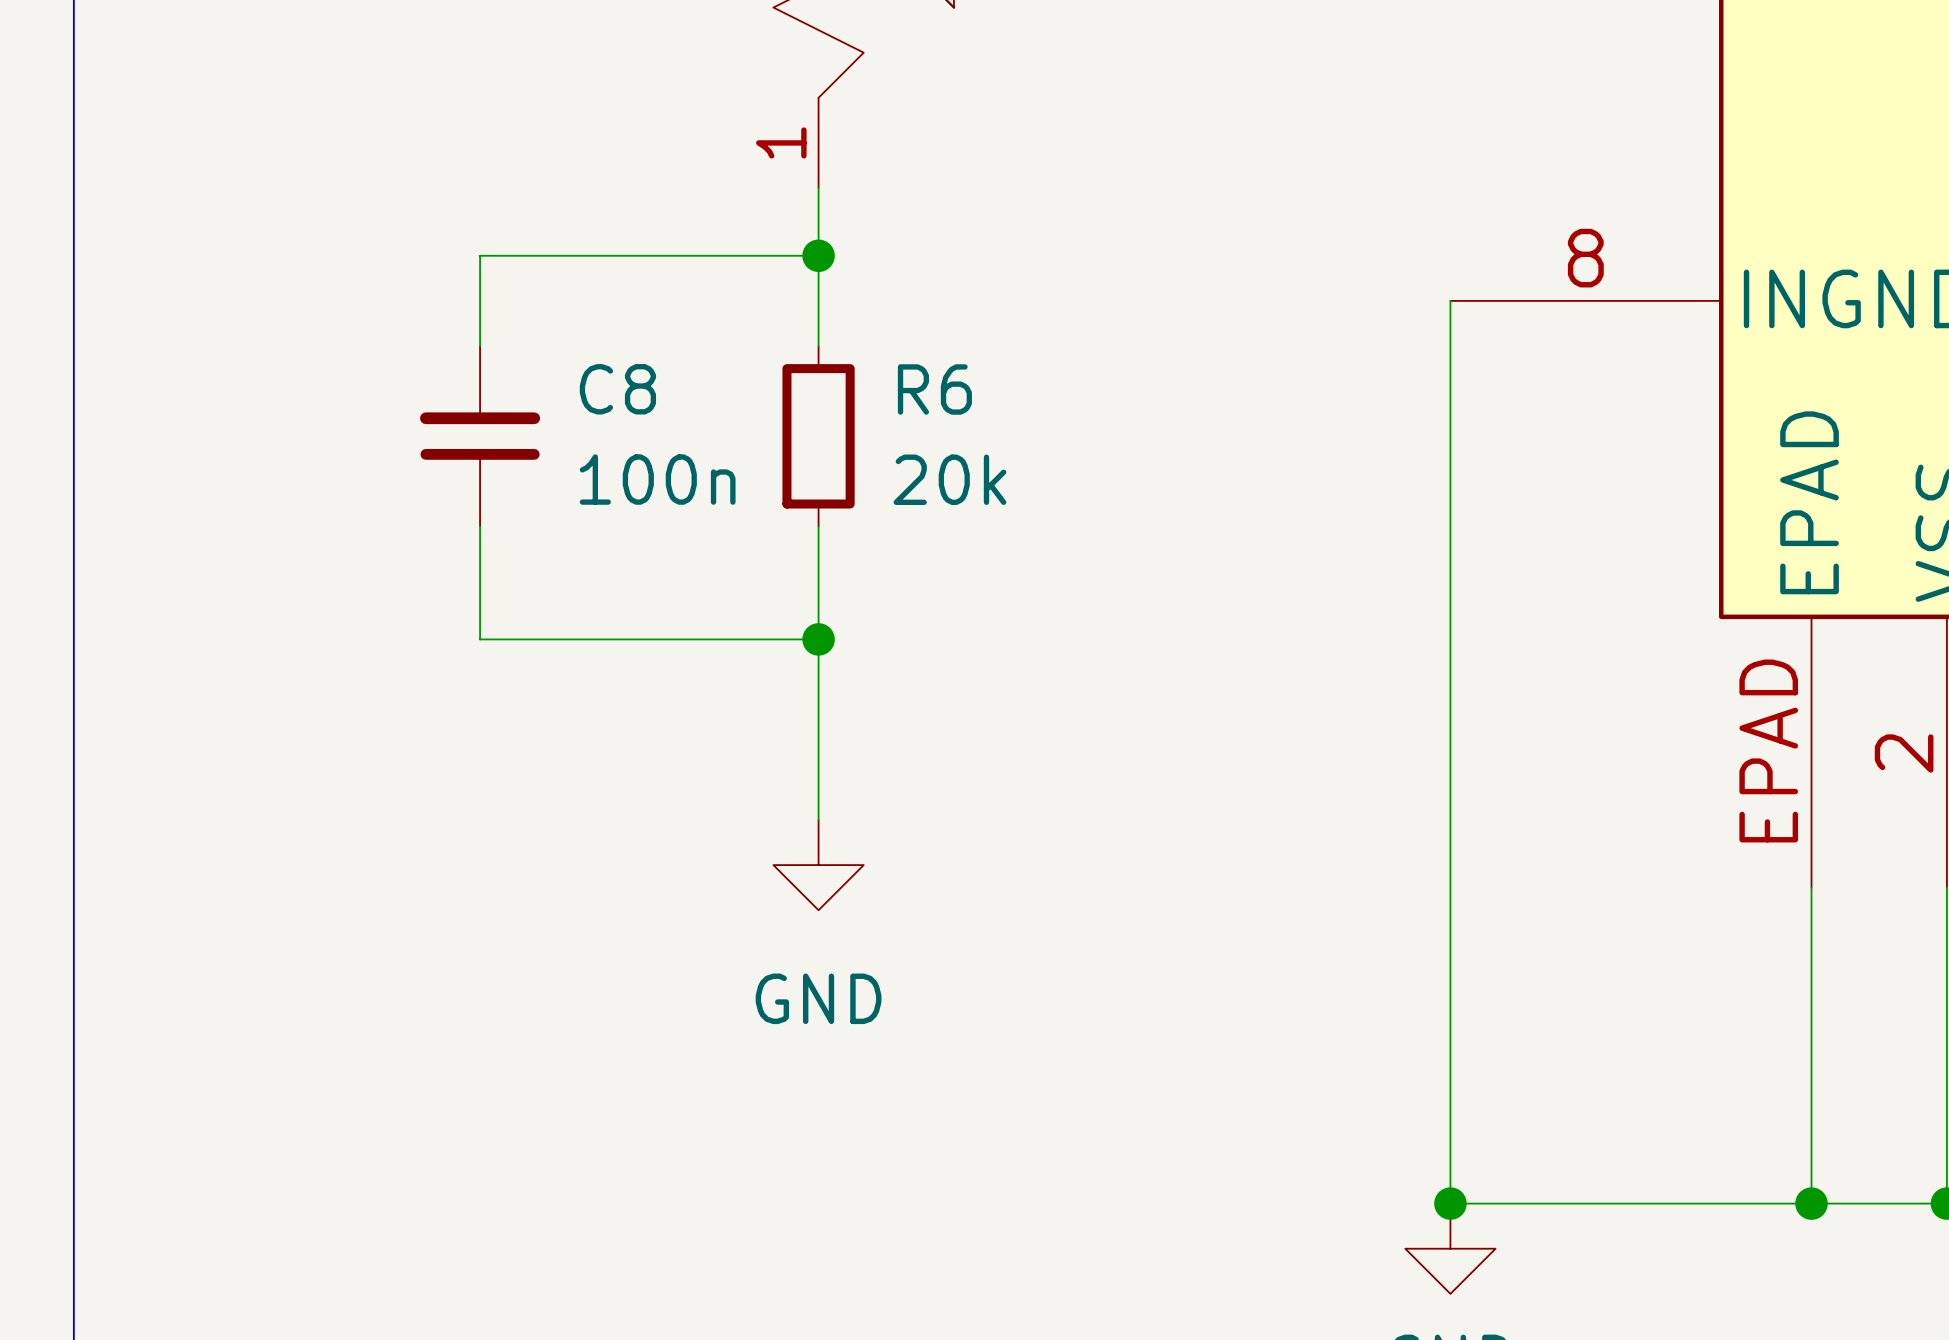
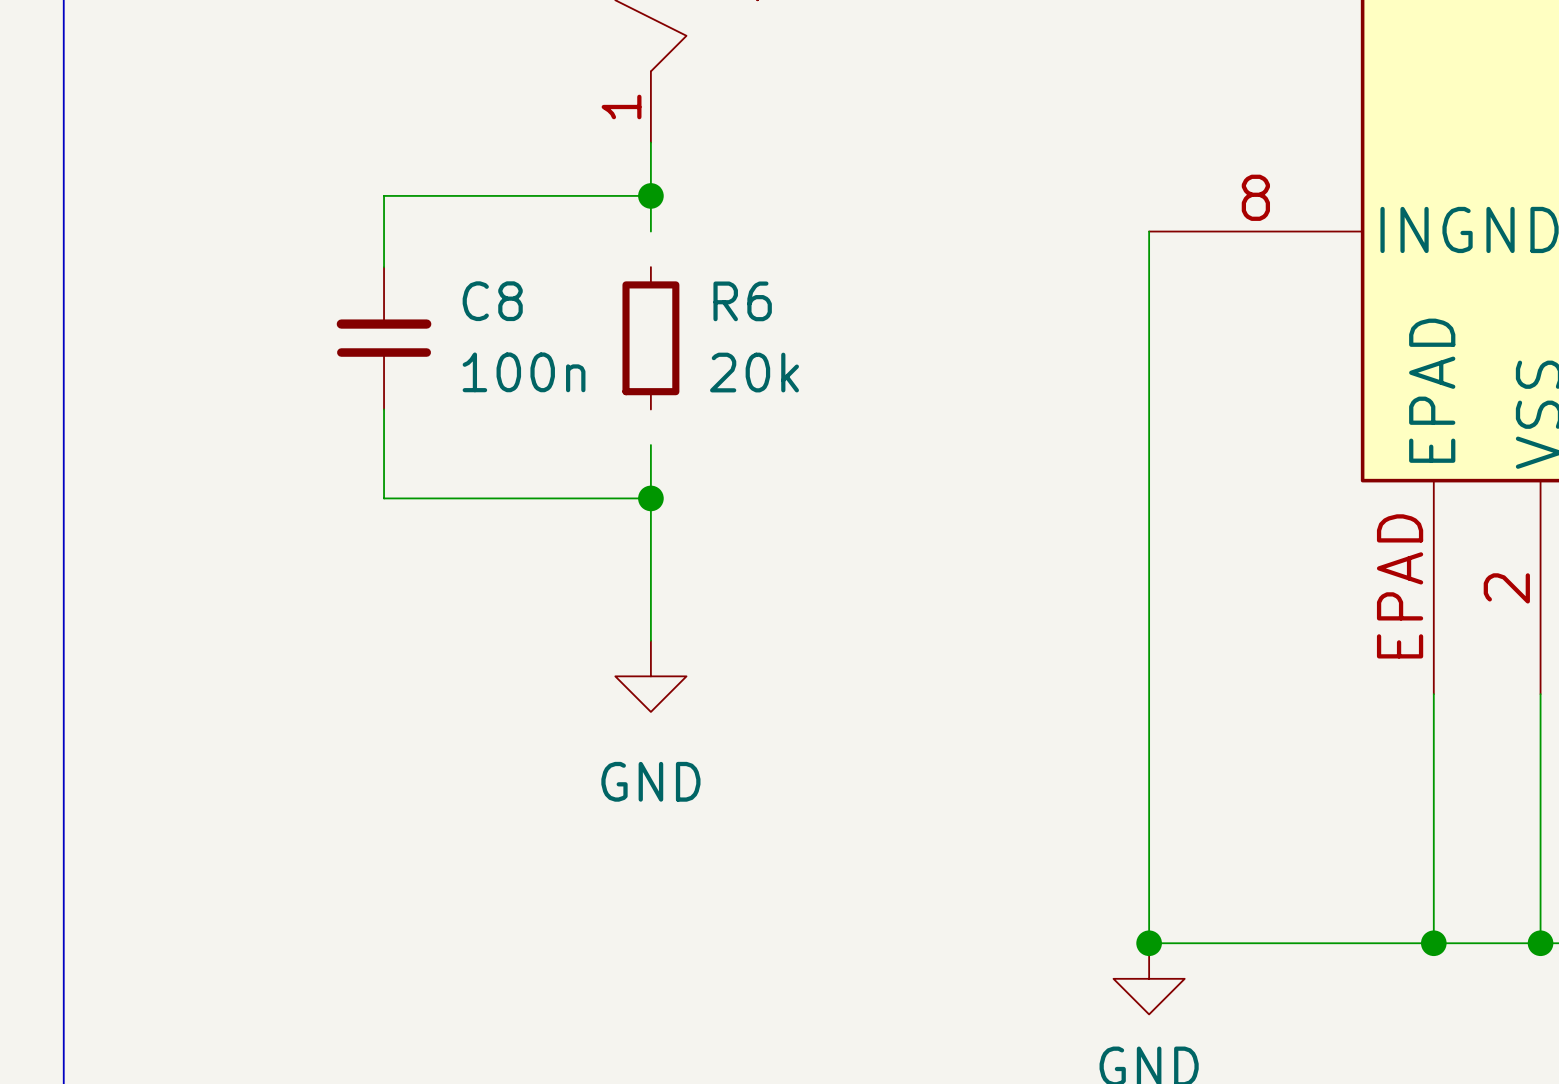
wire: (818, 300) (818, 346) -> none
wire: (818, 526) (818, 571) -> none

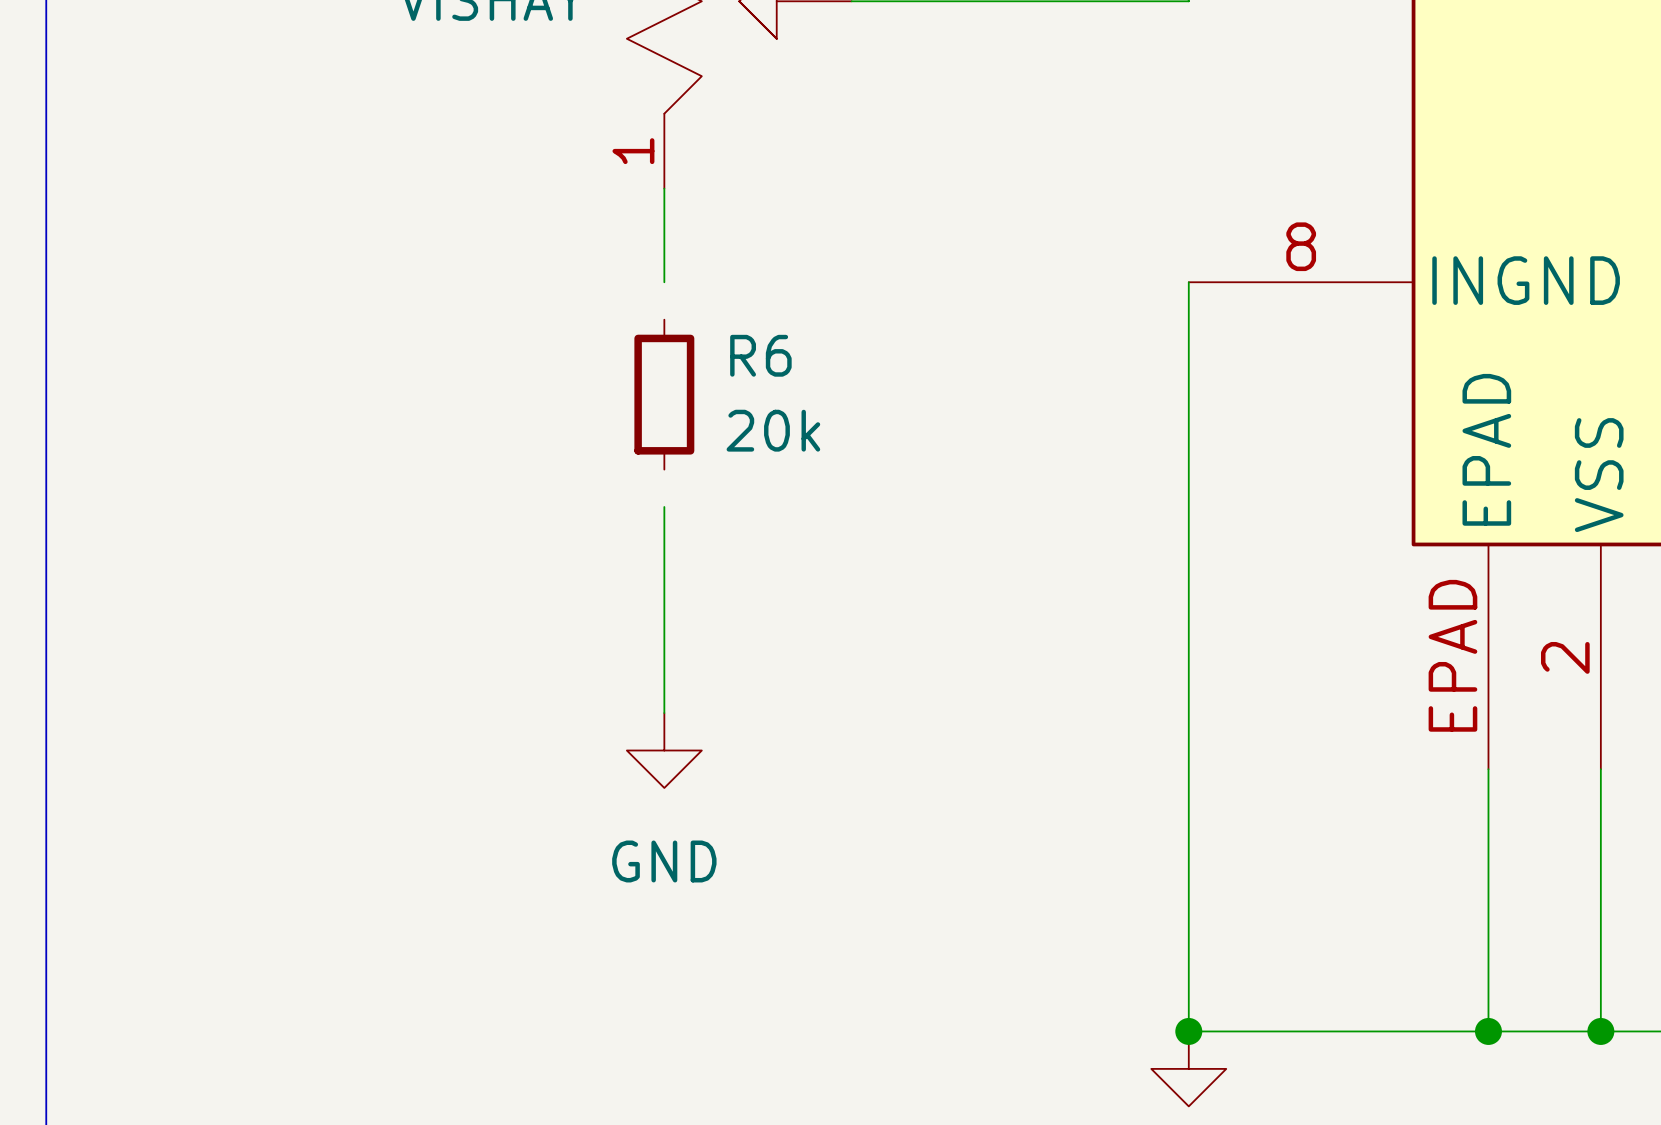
wire: (650, 195) (384, 195) (384, 267) -> none
junction: (650, 195) -> none
C8: (384, 338) -> none
wire: (384, 409) (384, 498) (650, 498) -> none
junction: (650, 498) -> none

